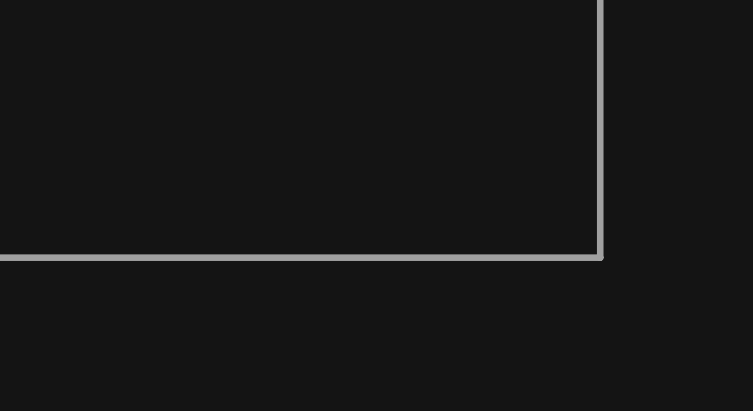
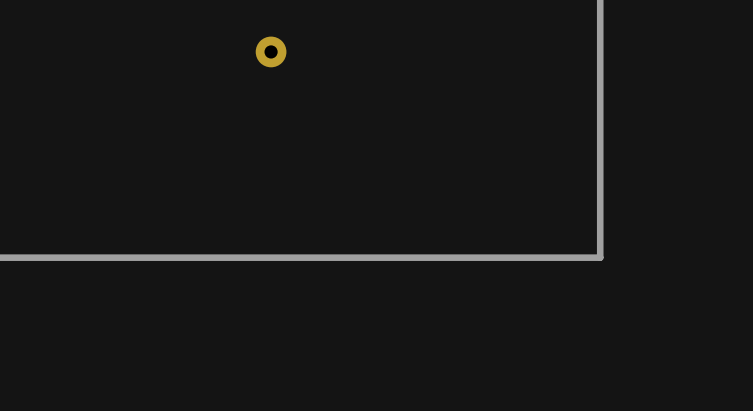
via: none -> (271, 51)

